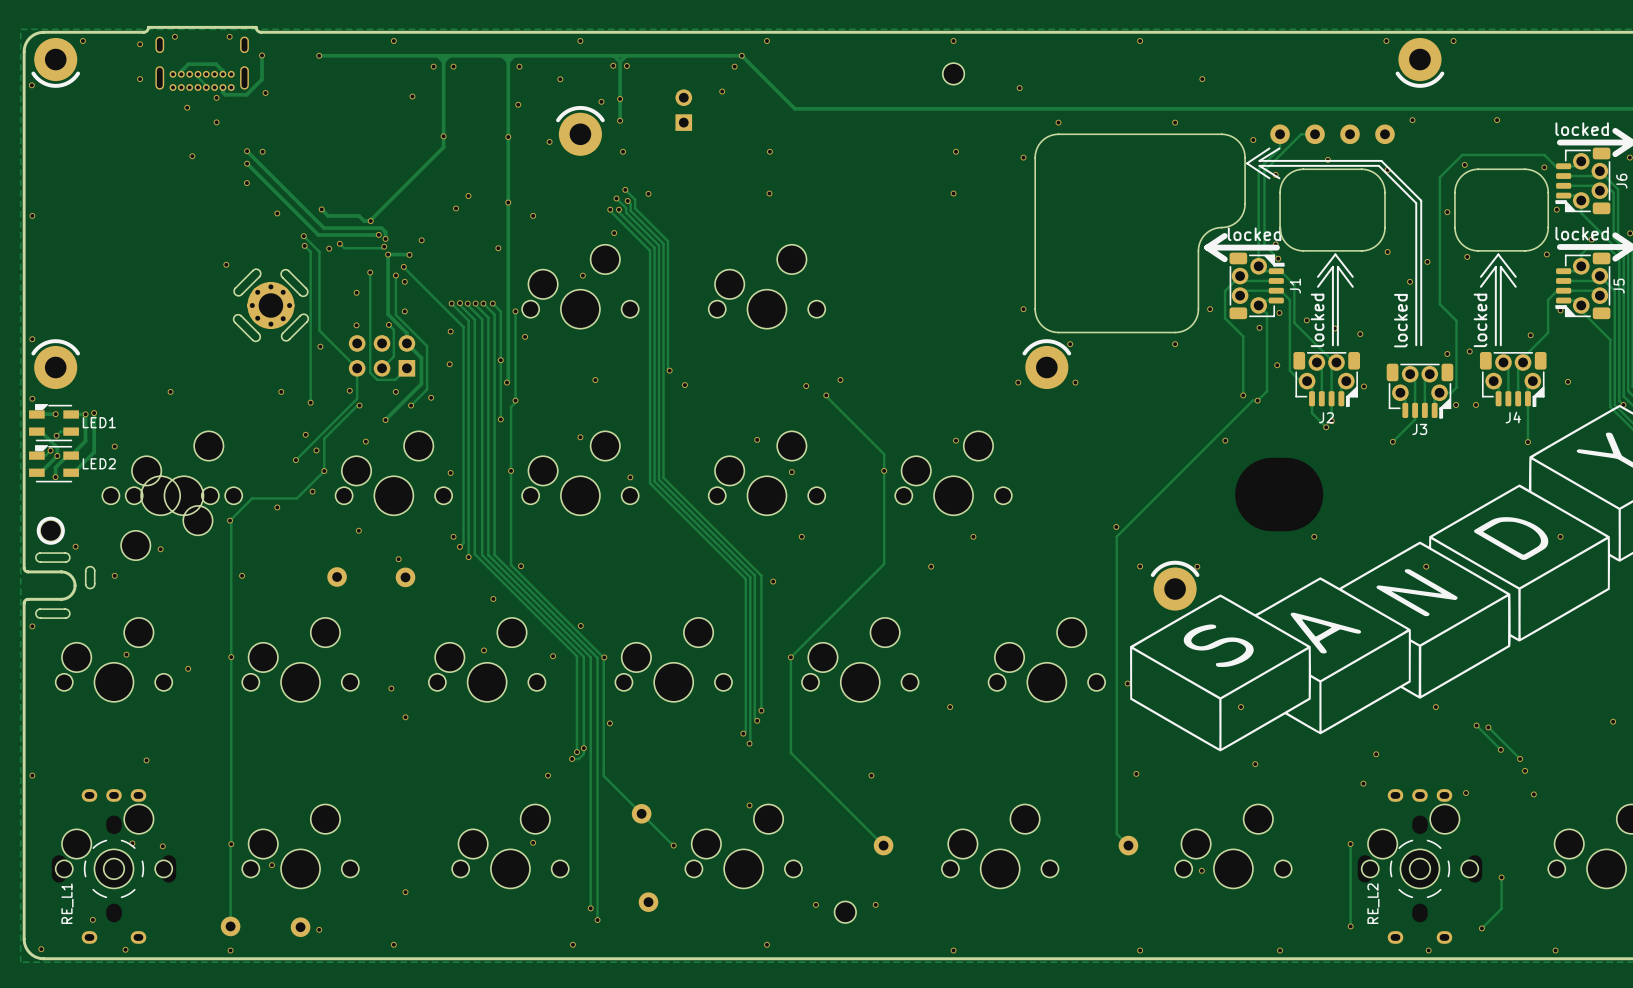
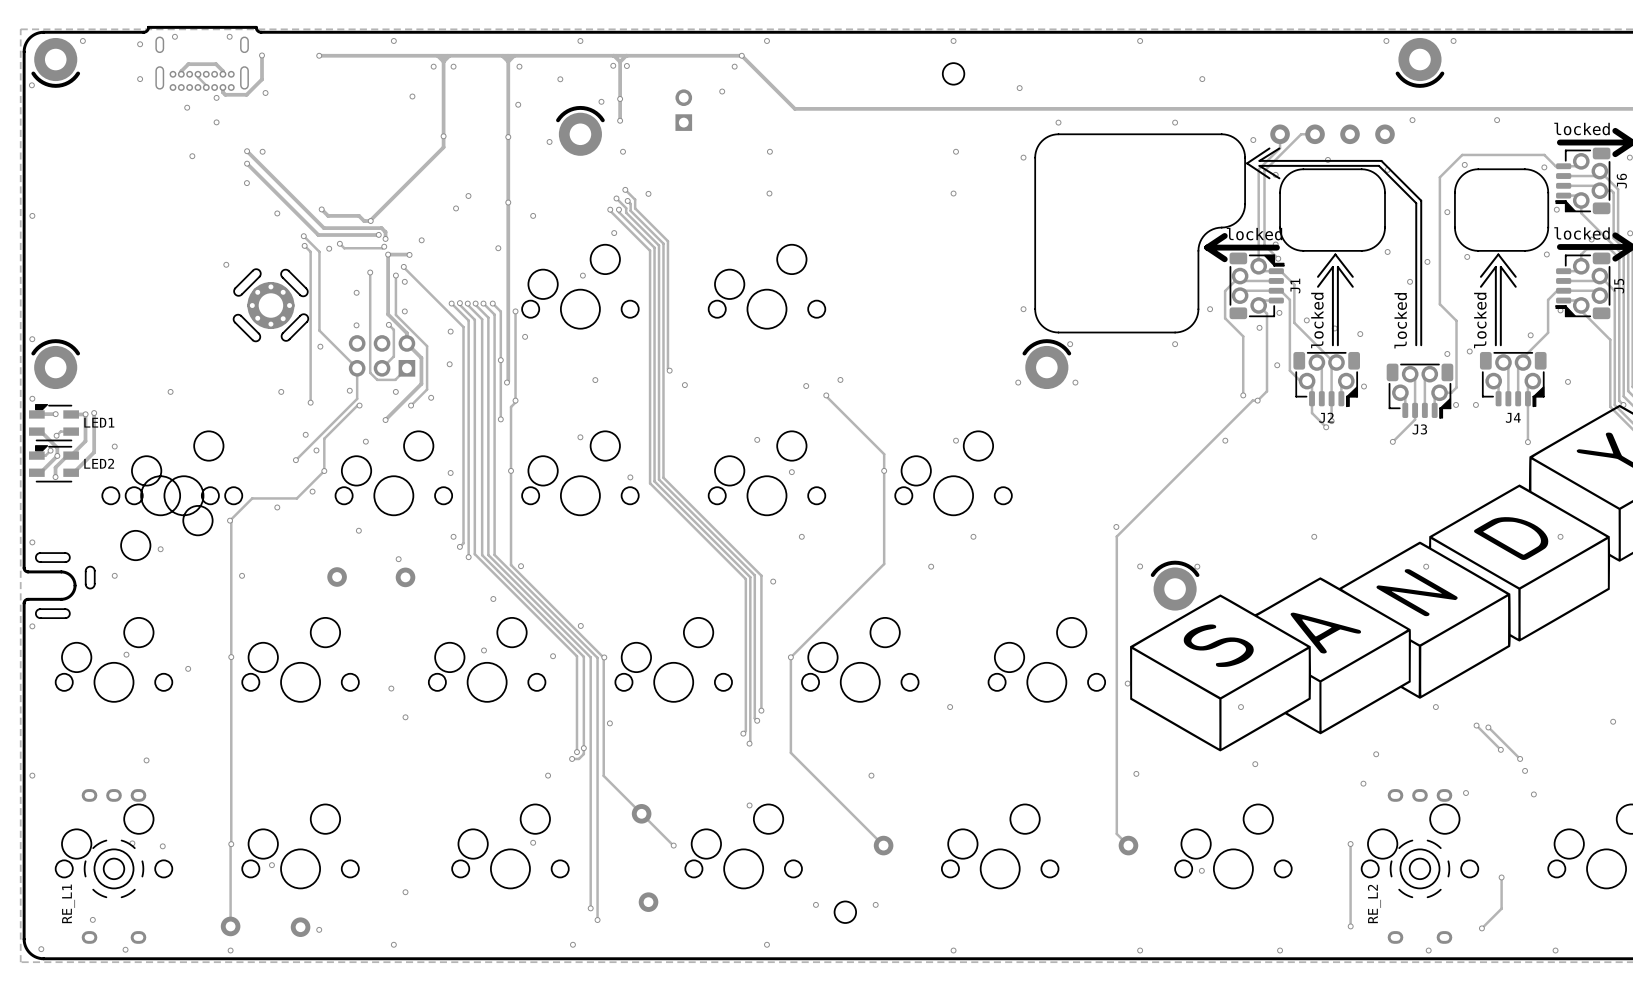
part: (50, 530) -> none
via position: (75, 546) -> (32, 542)

